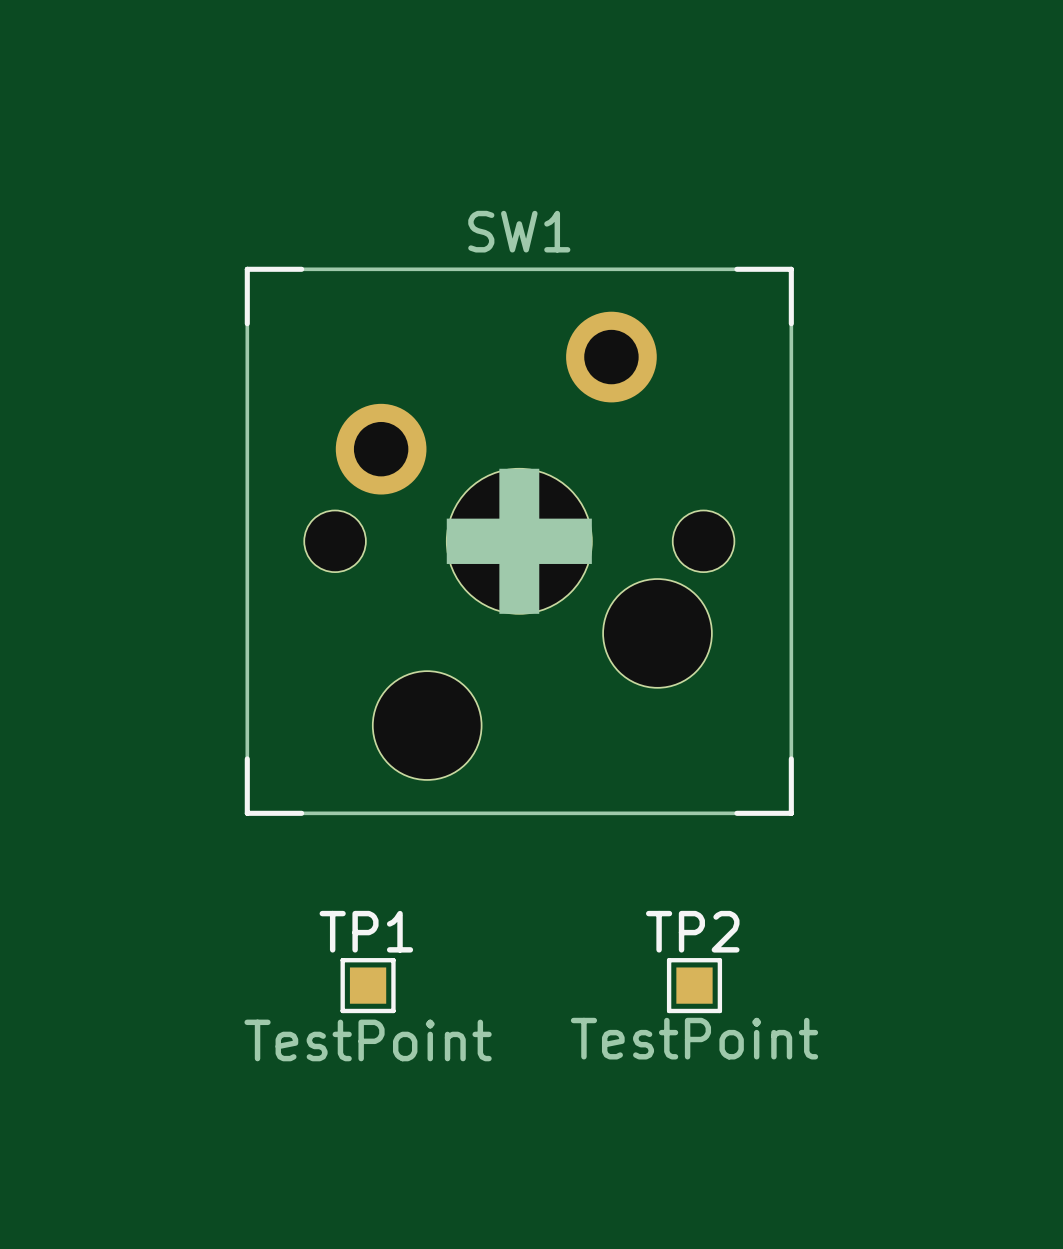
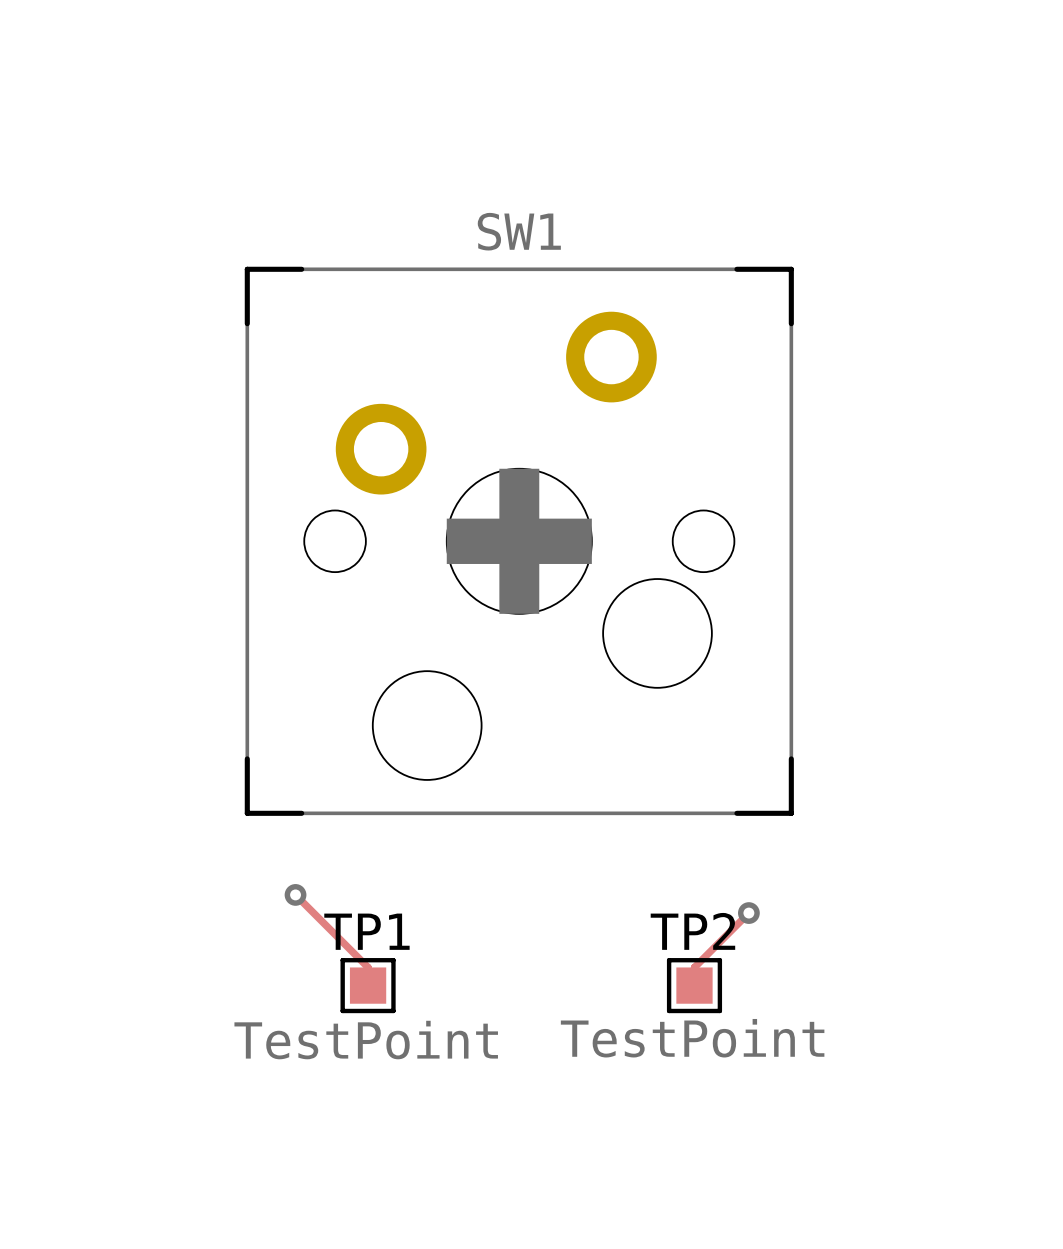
track: none -> (295, 894) (368, 967) (368, 985)
via: none -> (295, 894)
track: none -> (748, 913) (694, 967) (694, 985)
via: none -> (748, 913)

